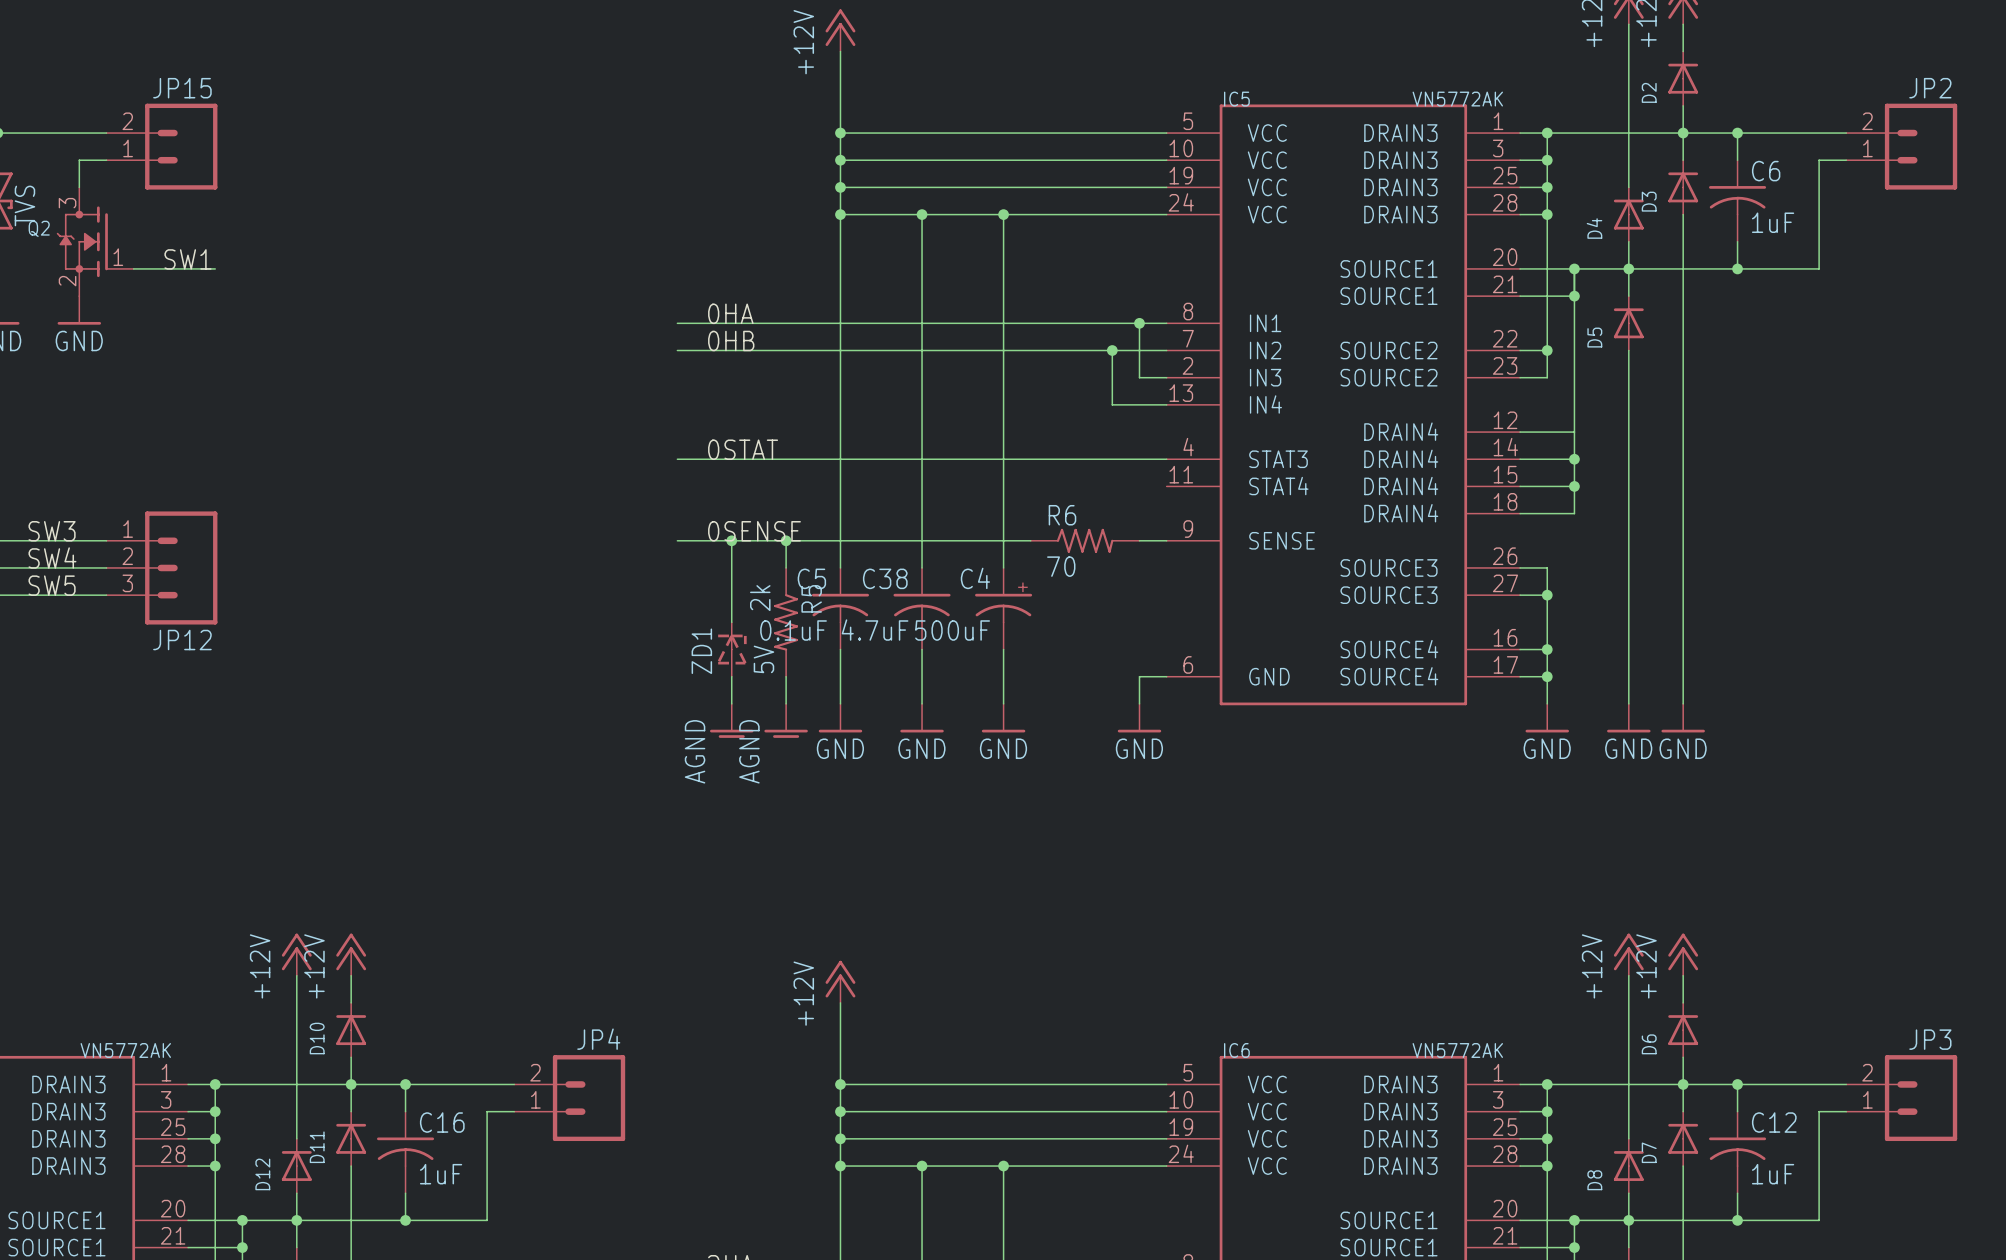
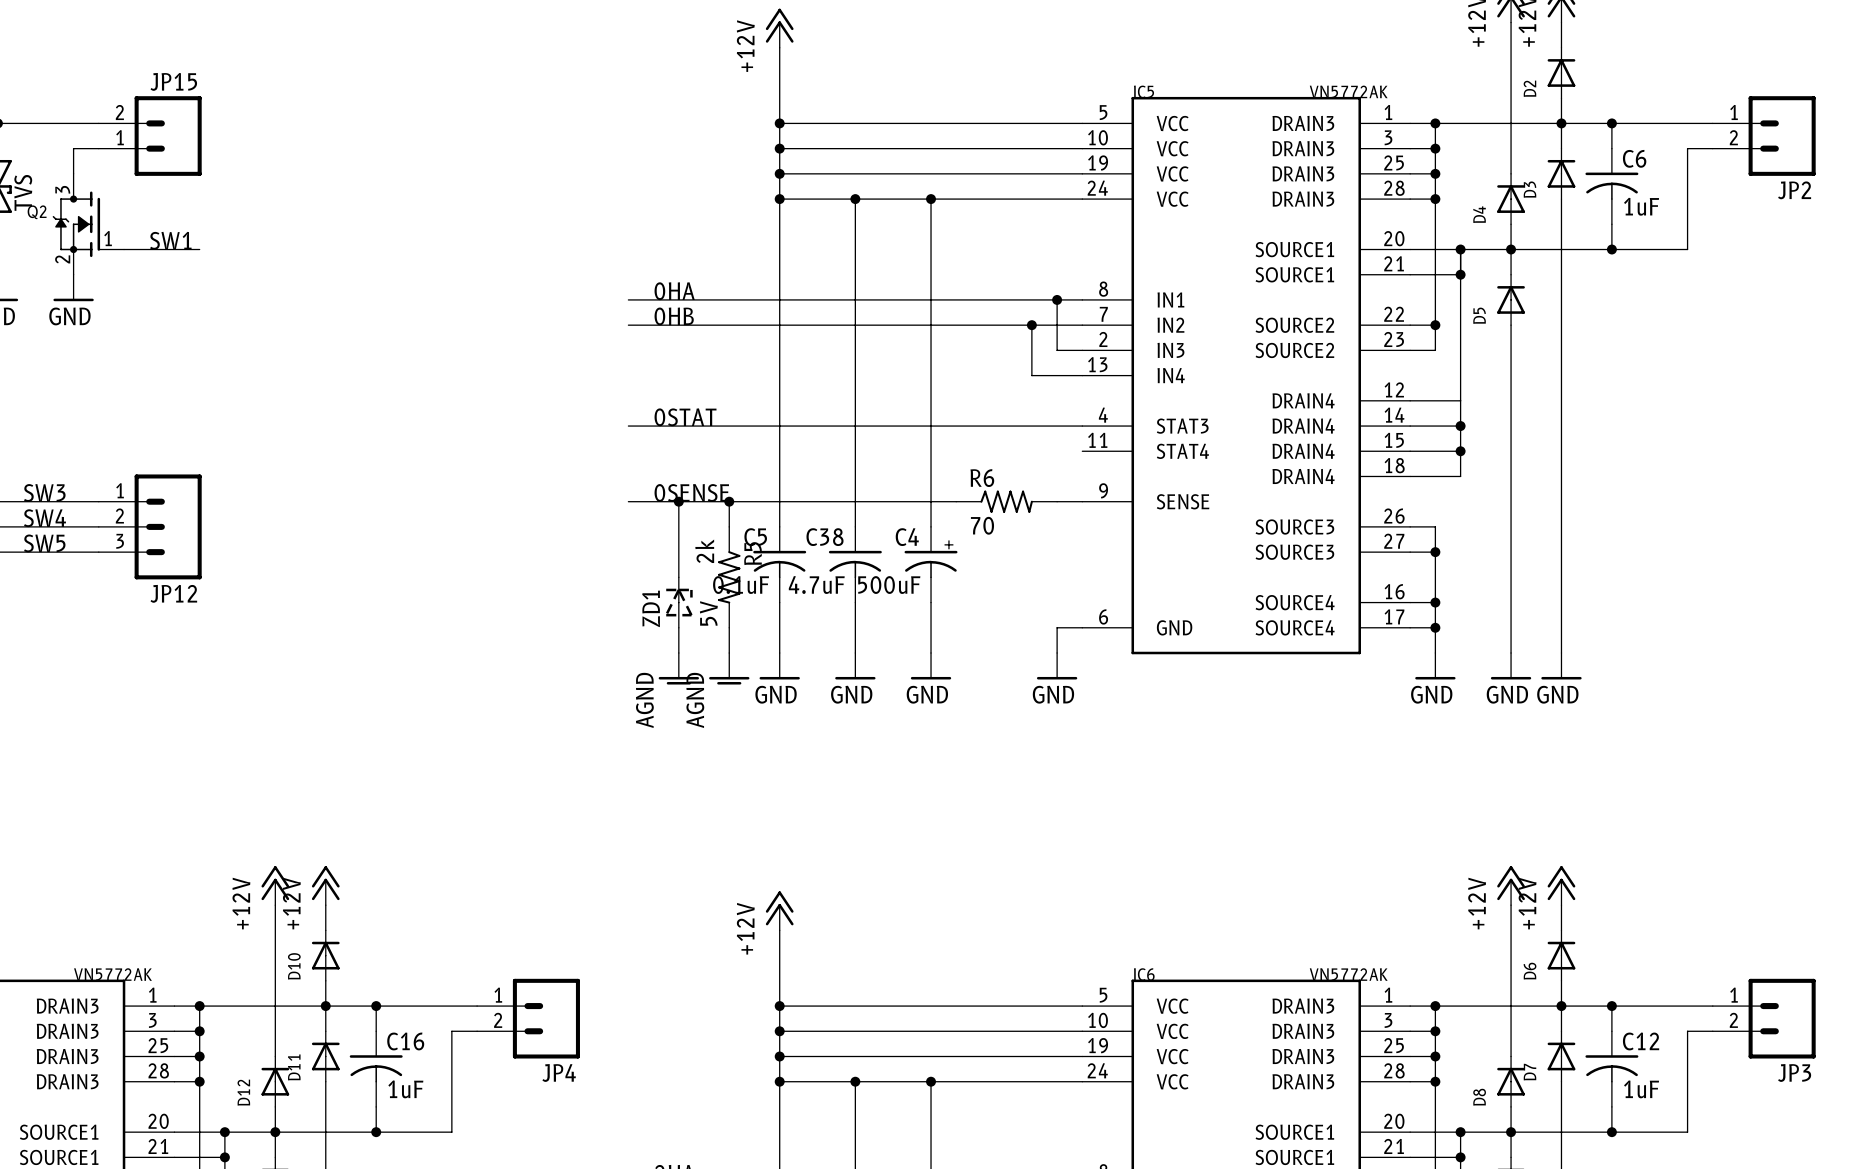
JP2 flip: as is (1921, 146) -> up-down (1782, 136)
JP4 flip: as is (589, 1098) -> up-down (546, 1018)
JP3 flip: as is (1921, 1098) -> up-down (1782, 1018)

